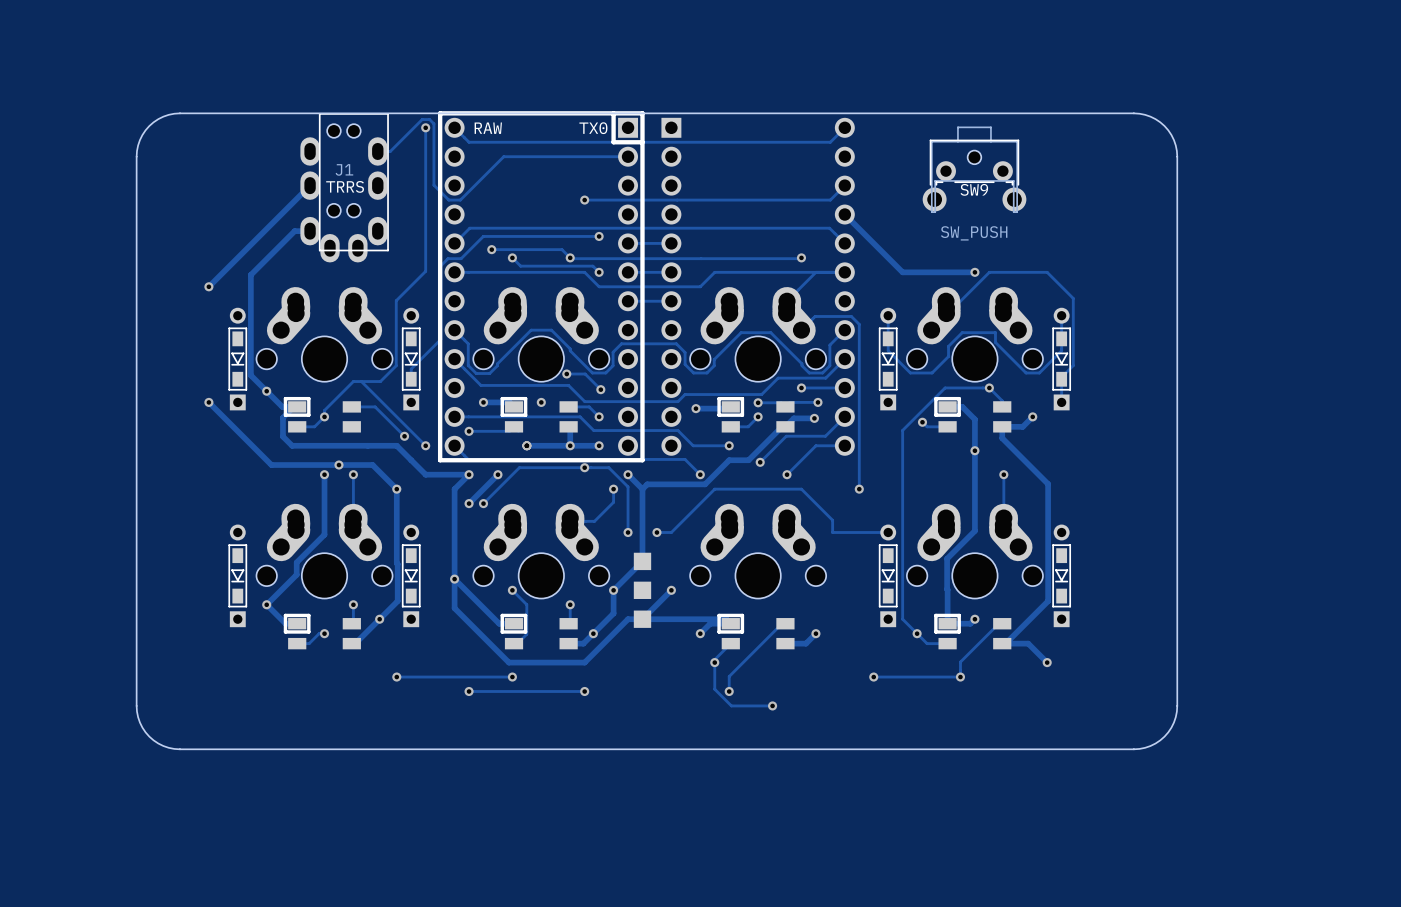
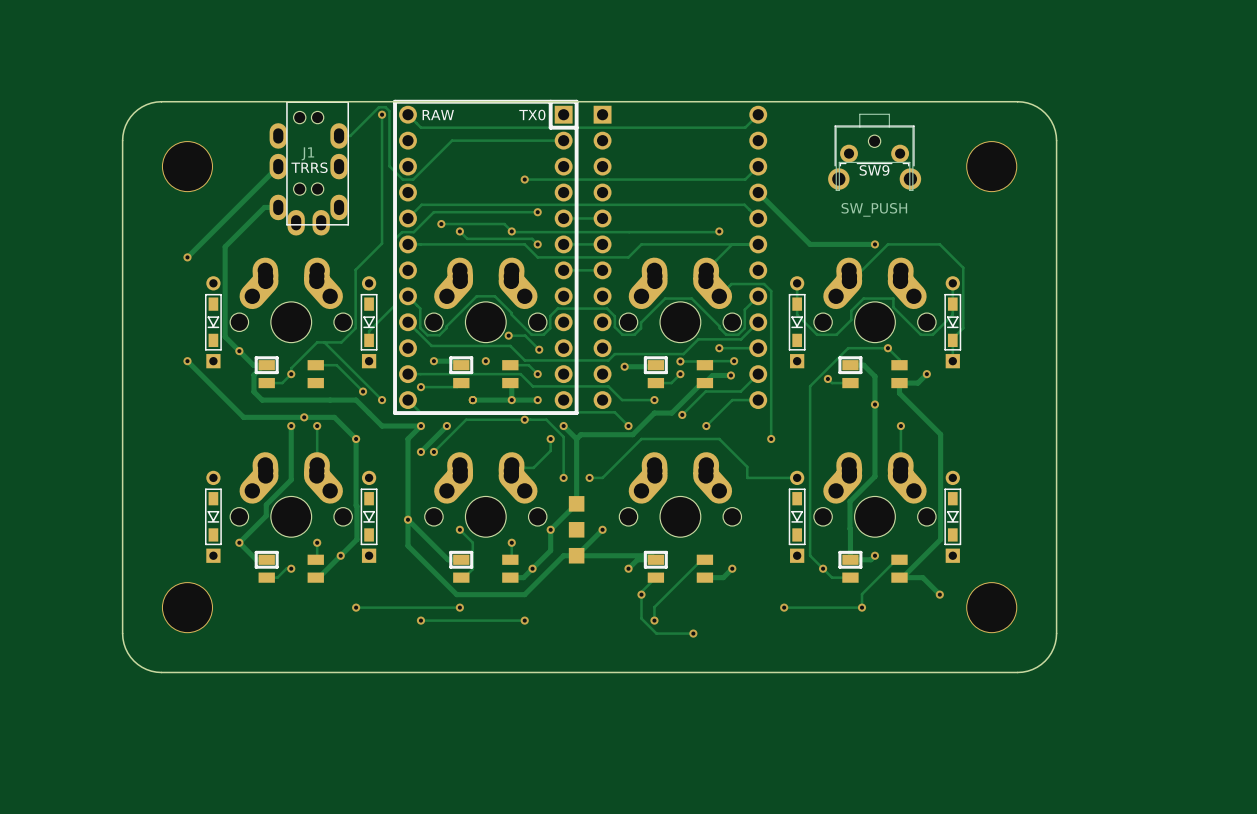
part: none -> (187, 166)
part: none -> (991, 166)
part: none -> (187, 607)
part: none -> (991, 607)

